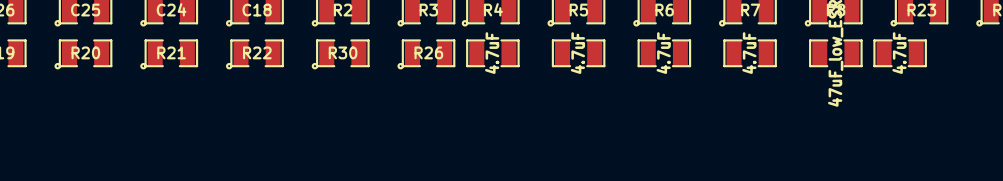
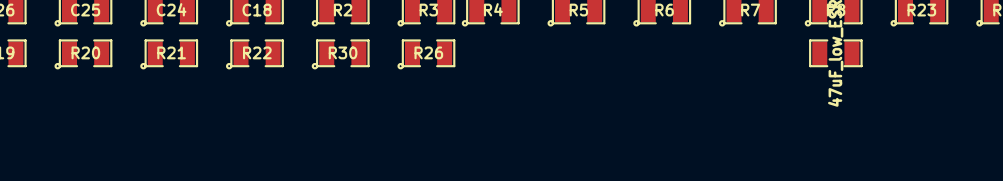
part: 4.7uF (492, 53) -> none
part: 4.7uF (578, 53) -> none
part: 4.7uF (664, 53) -> none
part: 4.7uF (750, 53) -> none
part: 4.7uF (900, 53) -> none

